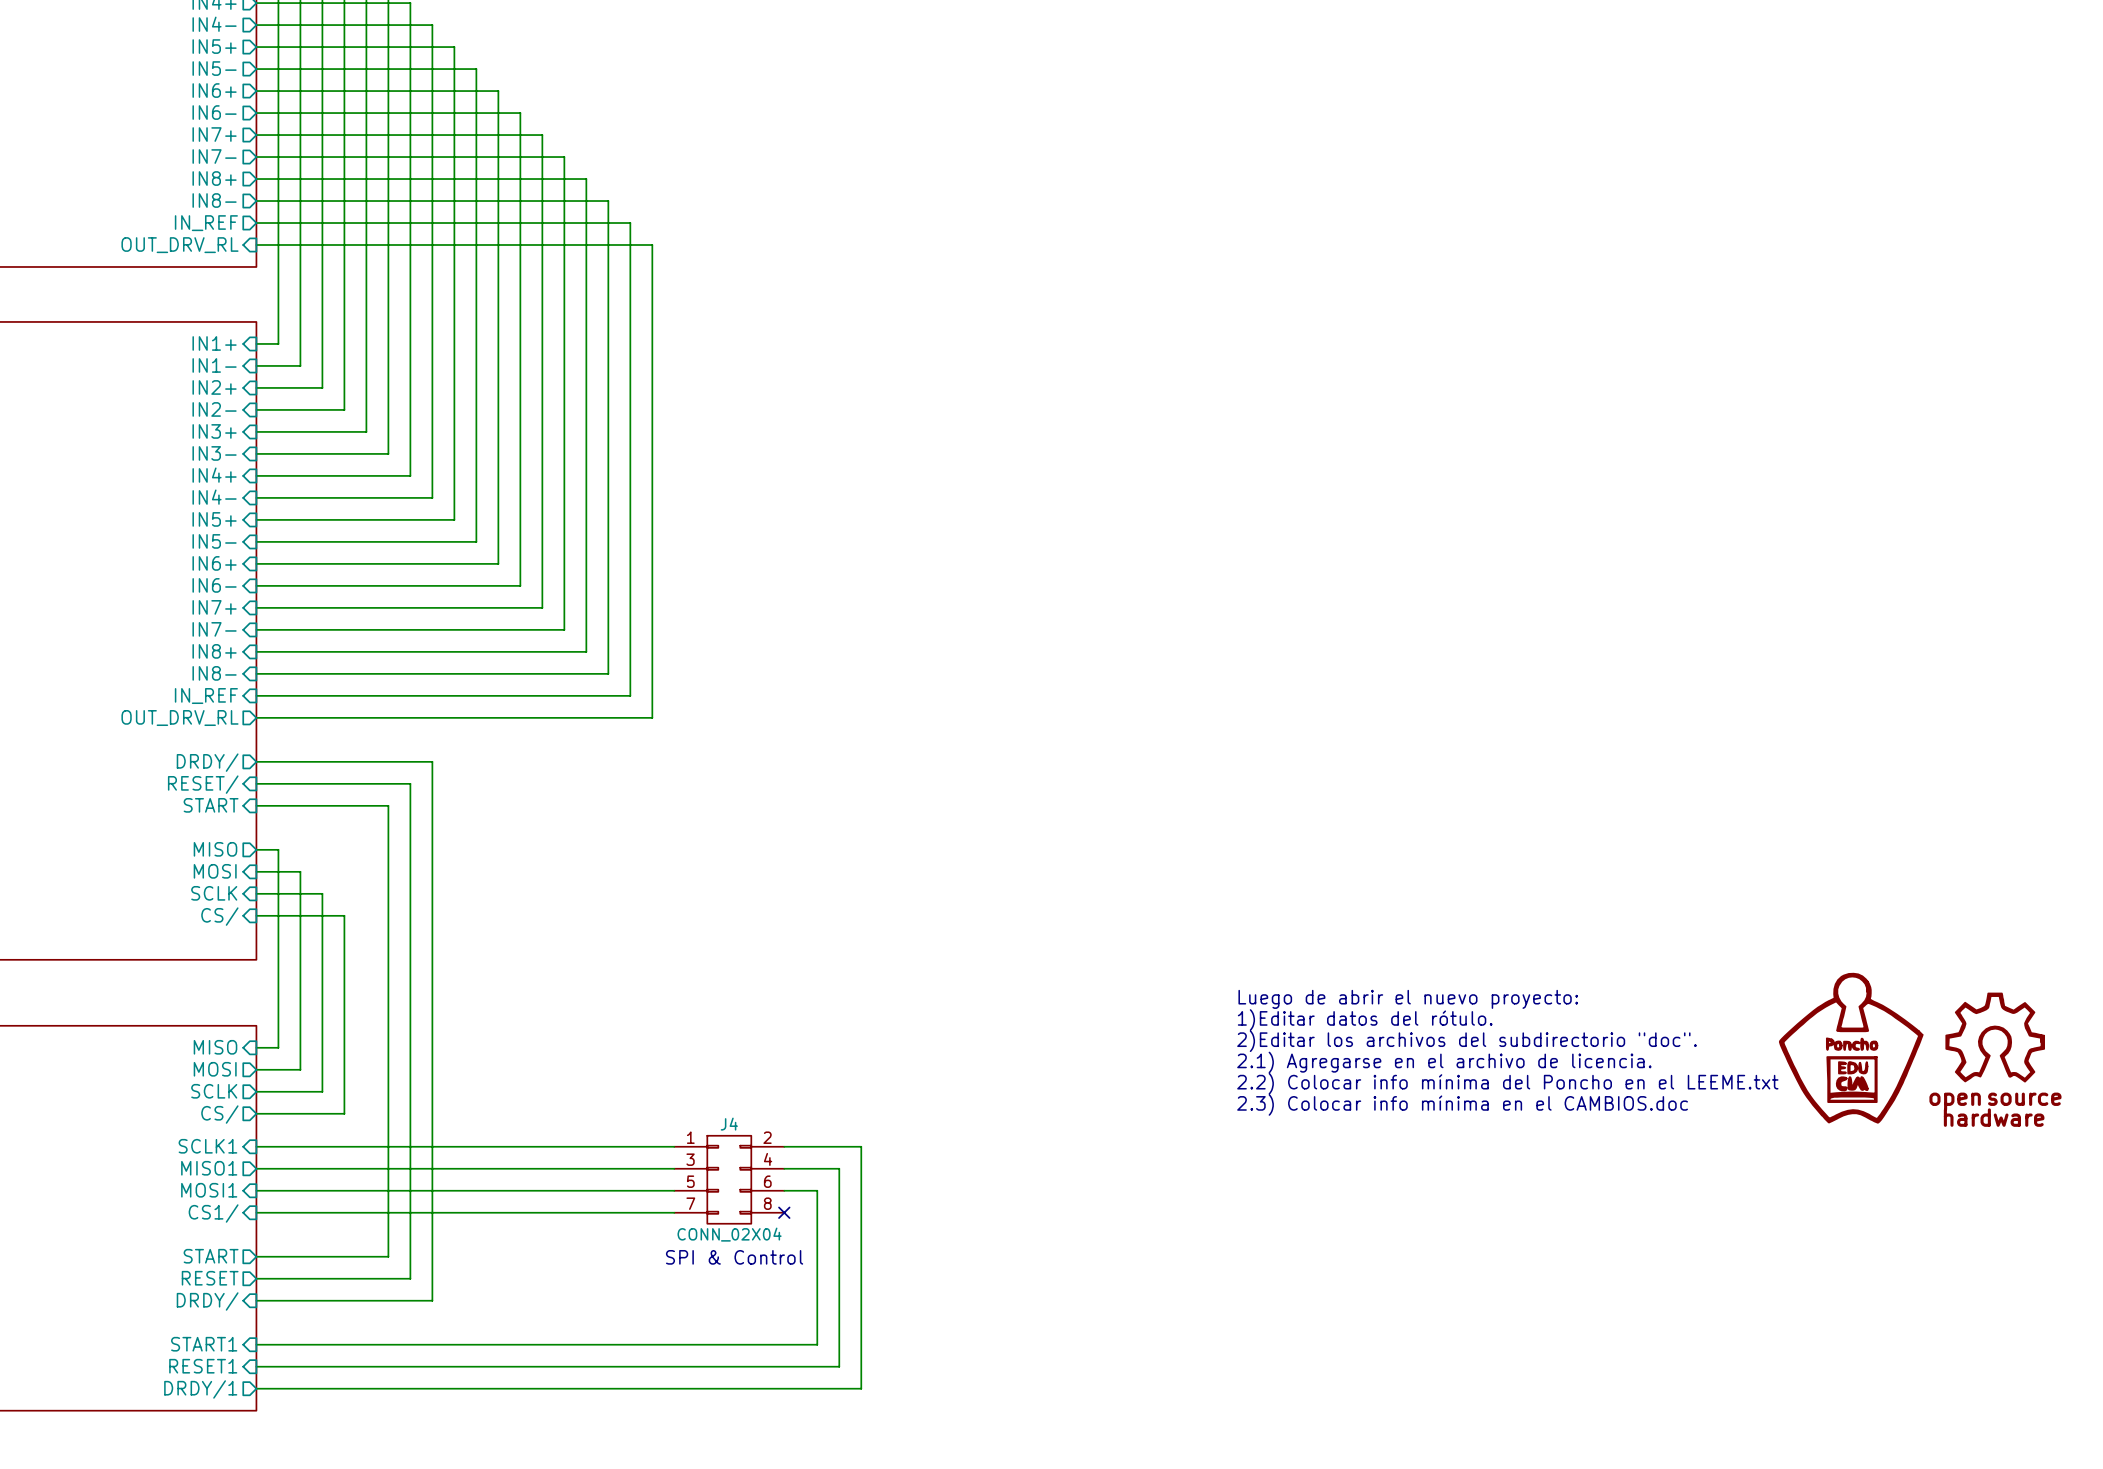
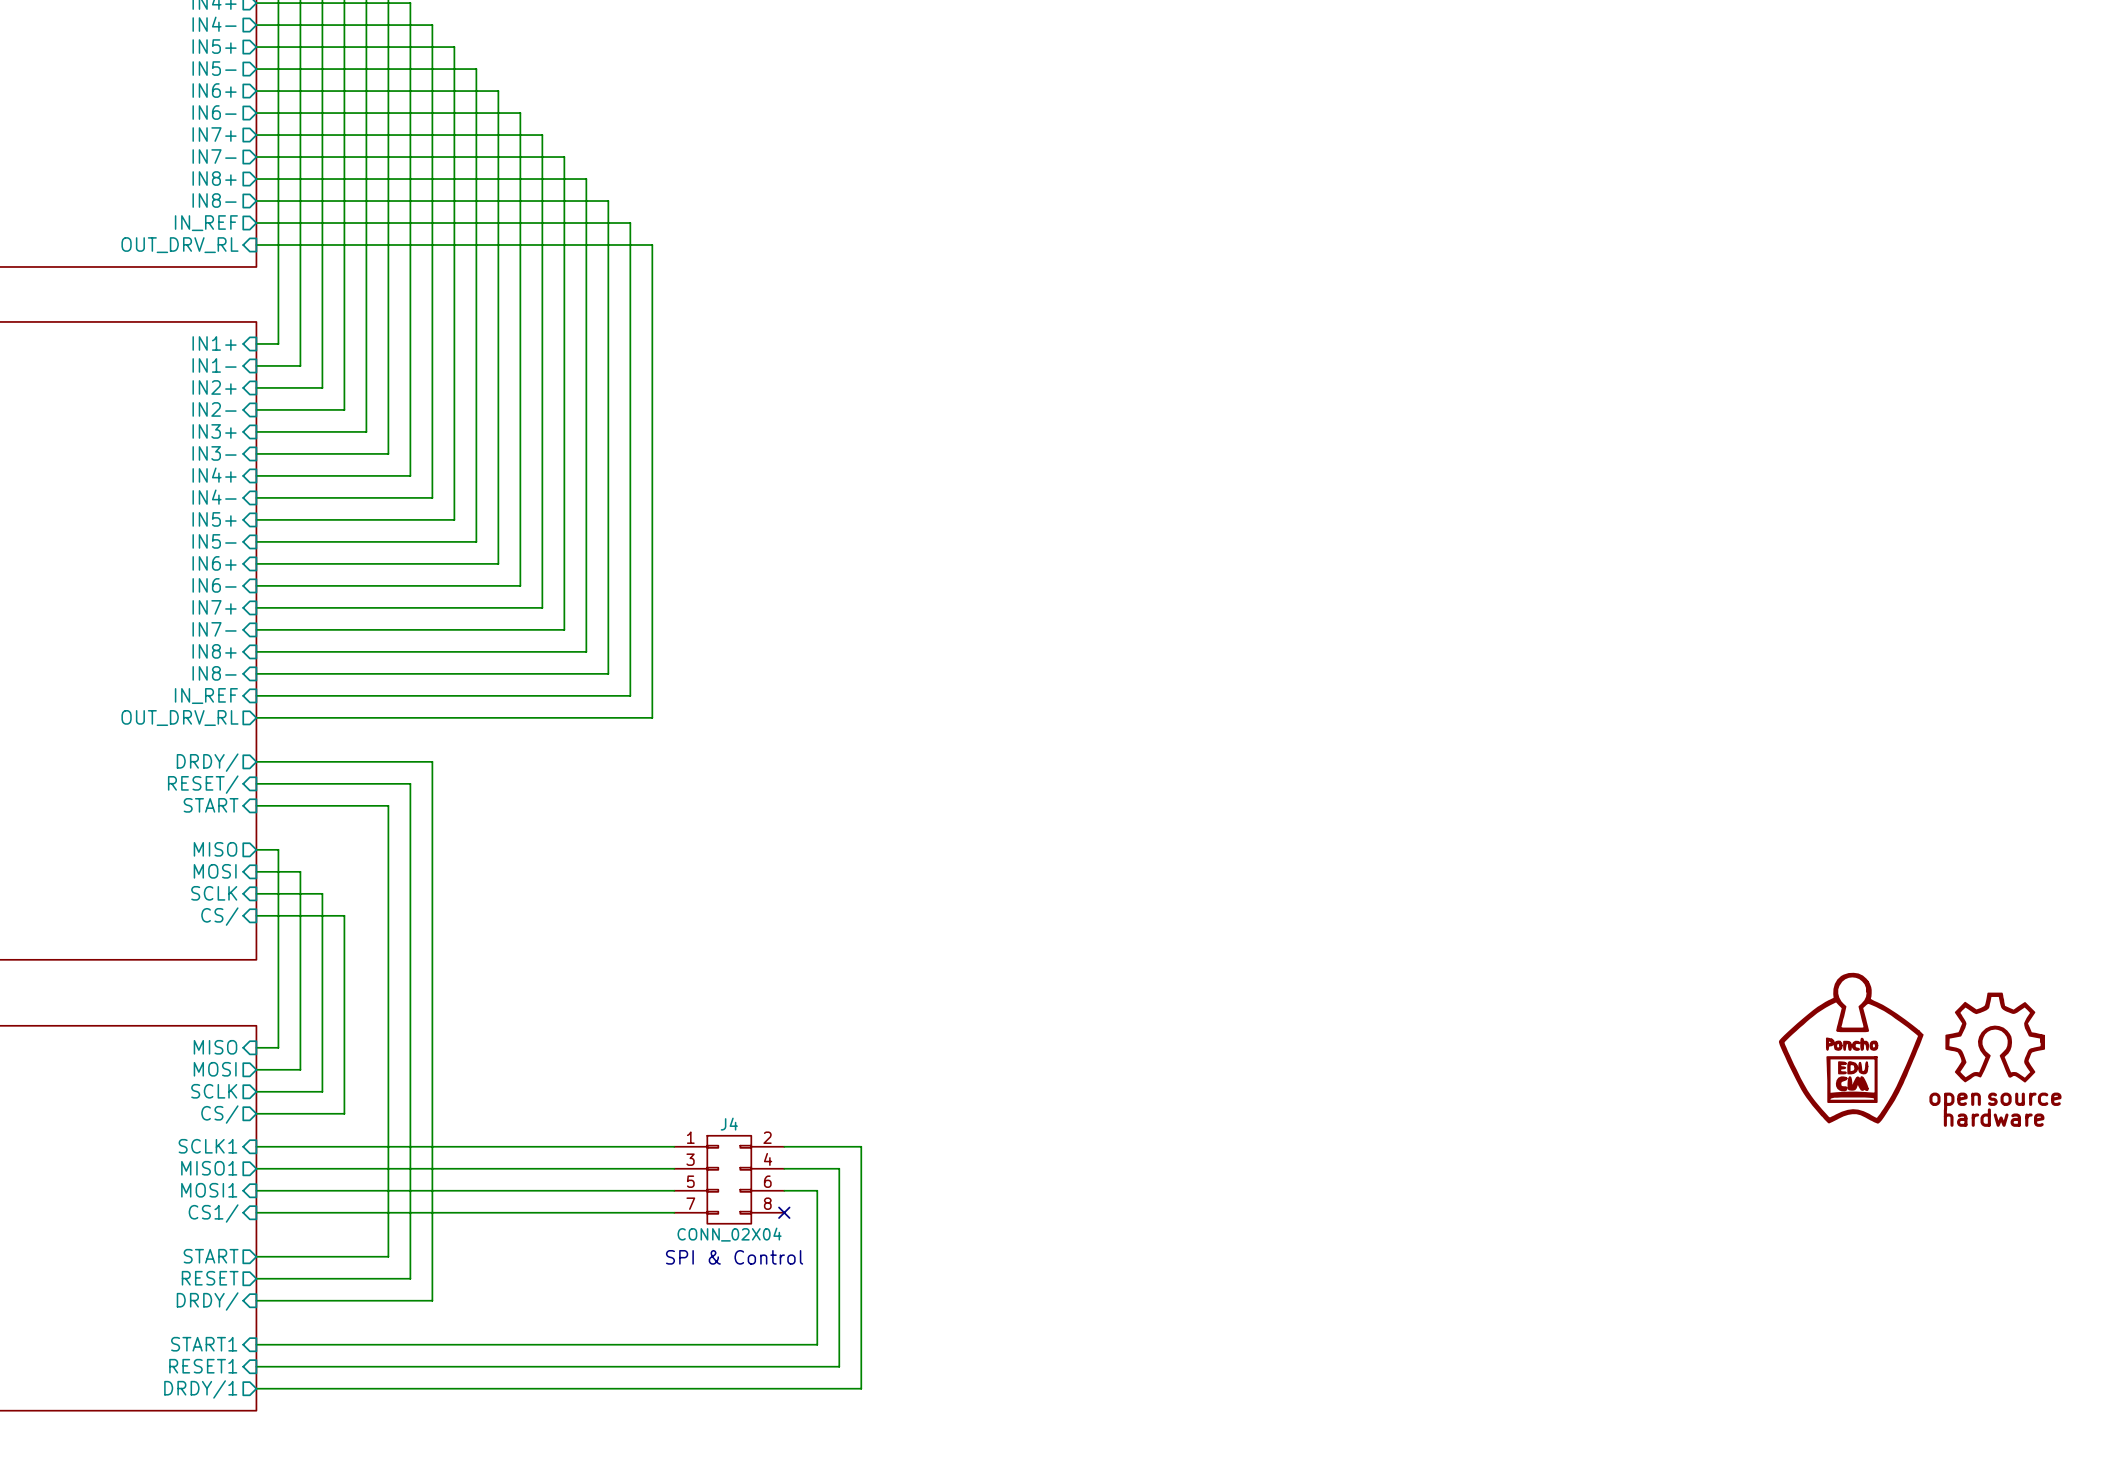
text: Luego de abrir el nuevo proyecto: (1408, 999) -> none
text: 1)Editar datos del rótulo. (1365, 1019) -> none
text: 2)Editar los archivos del subdirectorio "doc". (1466, 1041) -> none
text: 2.1) Agregarse en el archivo de licencia. (1444, 1062) -> none
text: 2.2) Colocar info mínima del Poncho en el LEEME.txt (1507, 1083) -> none
text: 2.3) Colocar info mínima en el CAMBIOS.doc (1462, 1104) -> none

